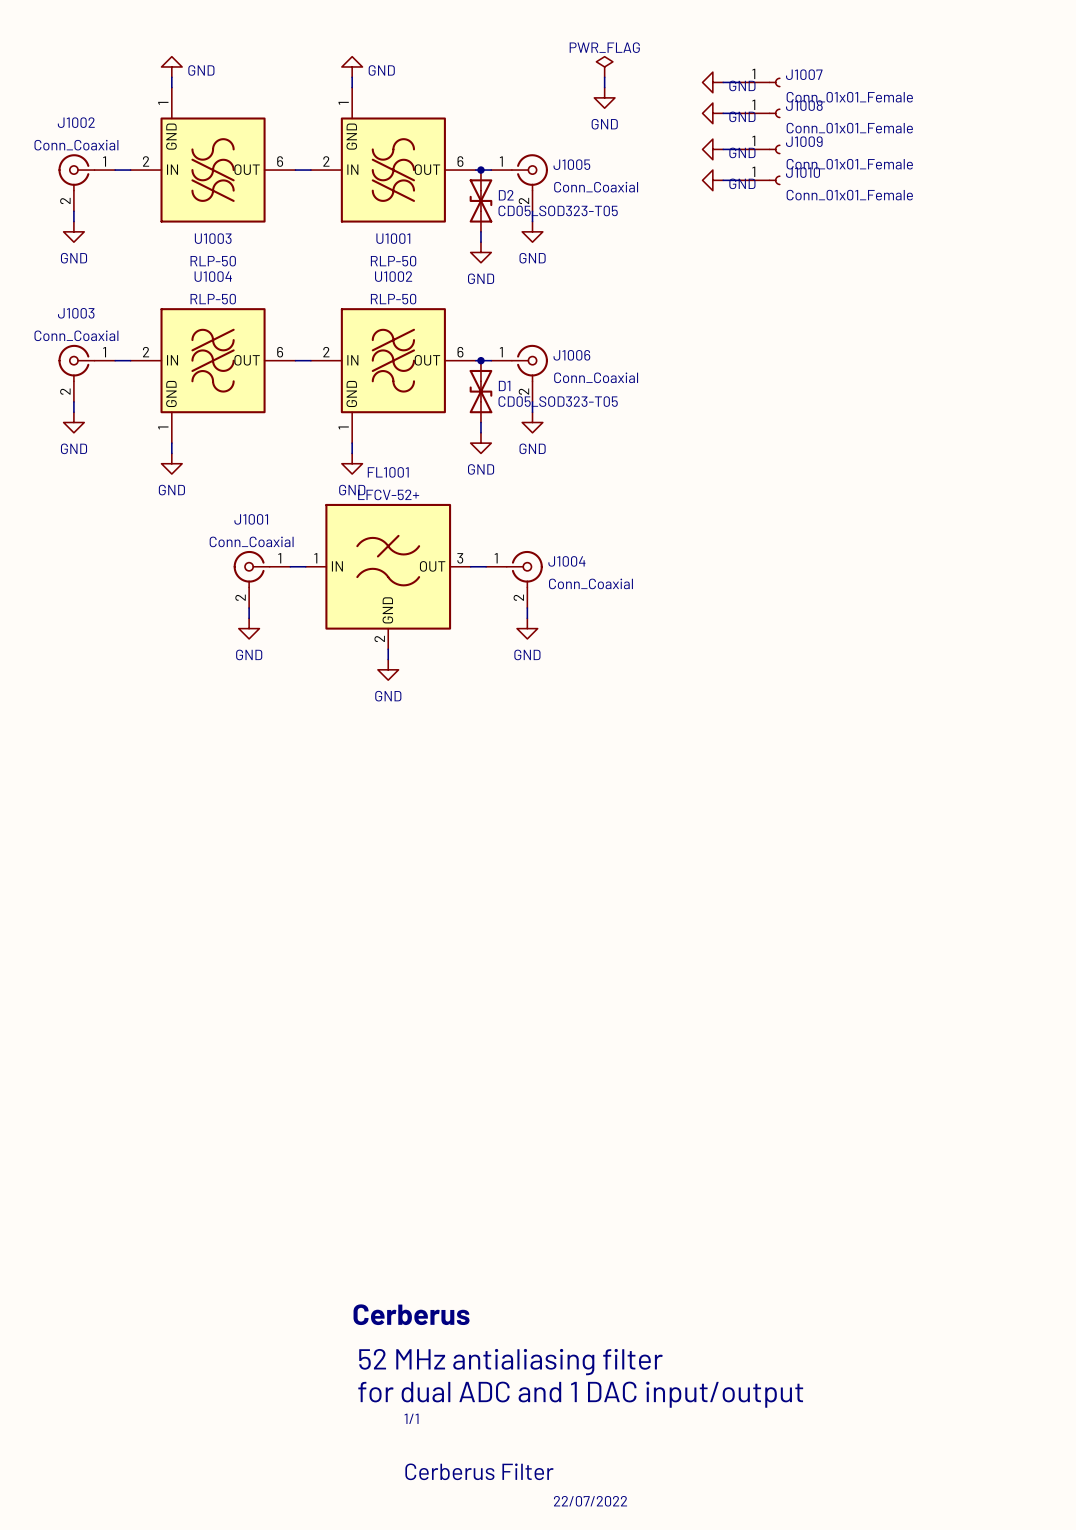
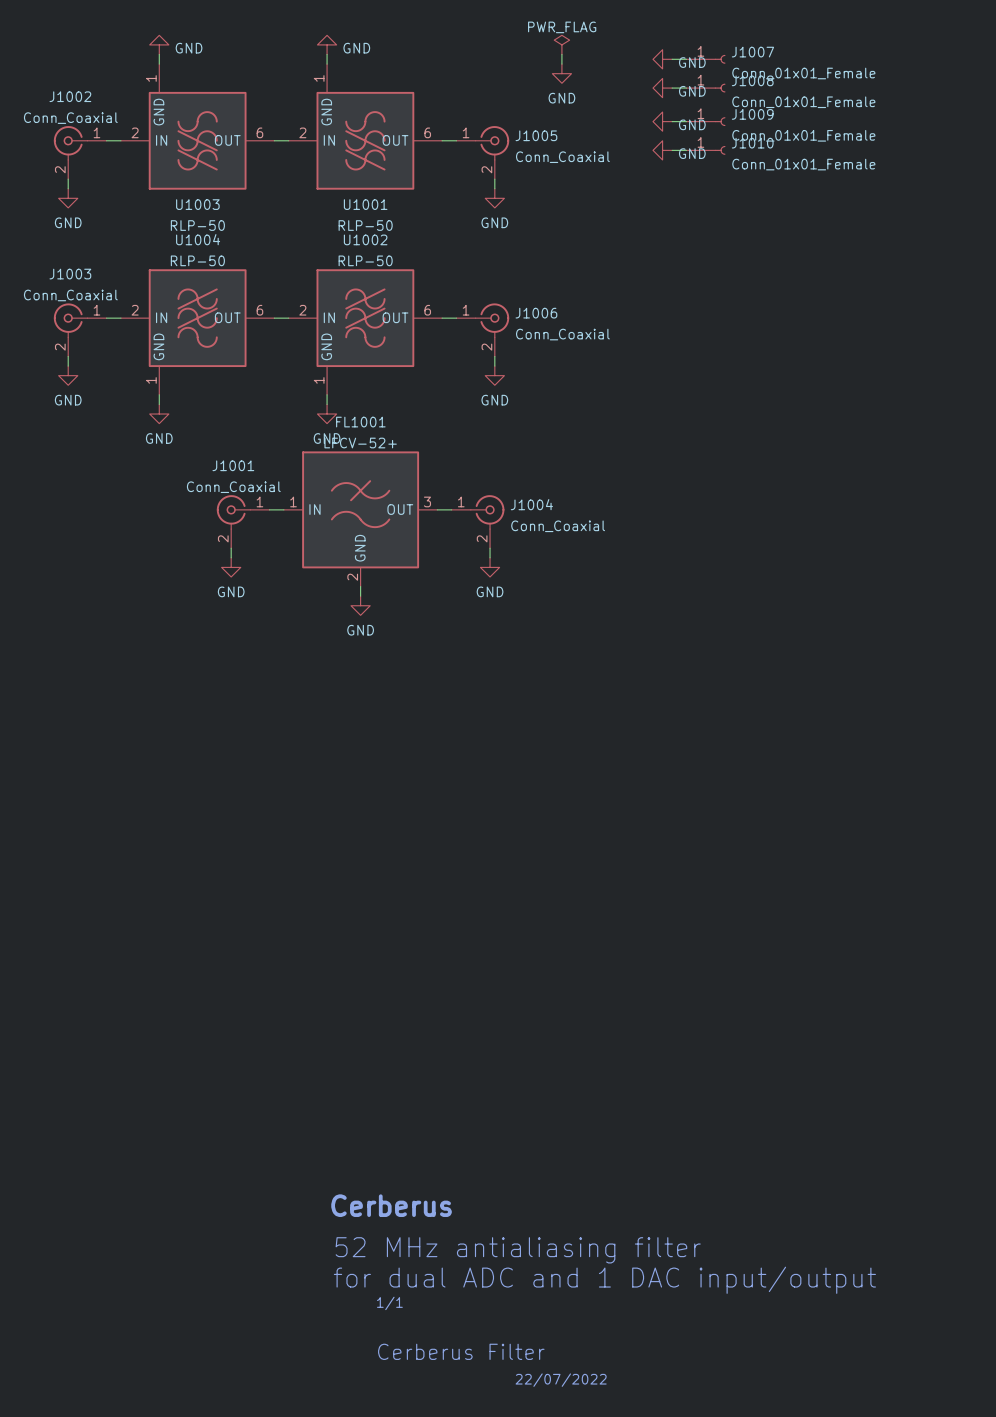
junction: (480, 170) -> none
D2: CD05_SOD323-T05 (480, 200) -> none
wire: (480, 231) (480, 242) -> none
power symbol: GND (480, 252) -> none
junction: (480, 360) -> none
D1: CD05_SOD323-T05 (480, 391) -> none
wire: (480, 422) (480, 432) -> none
power symbol: GND (480, 443) -> none

